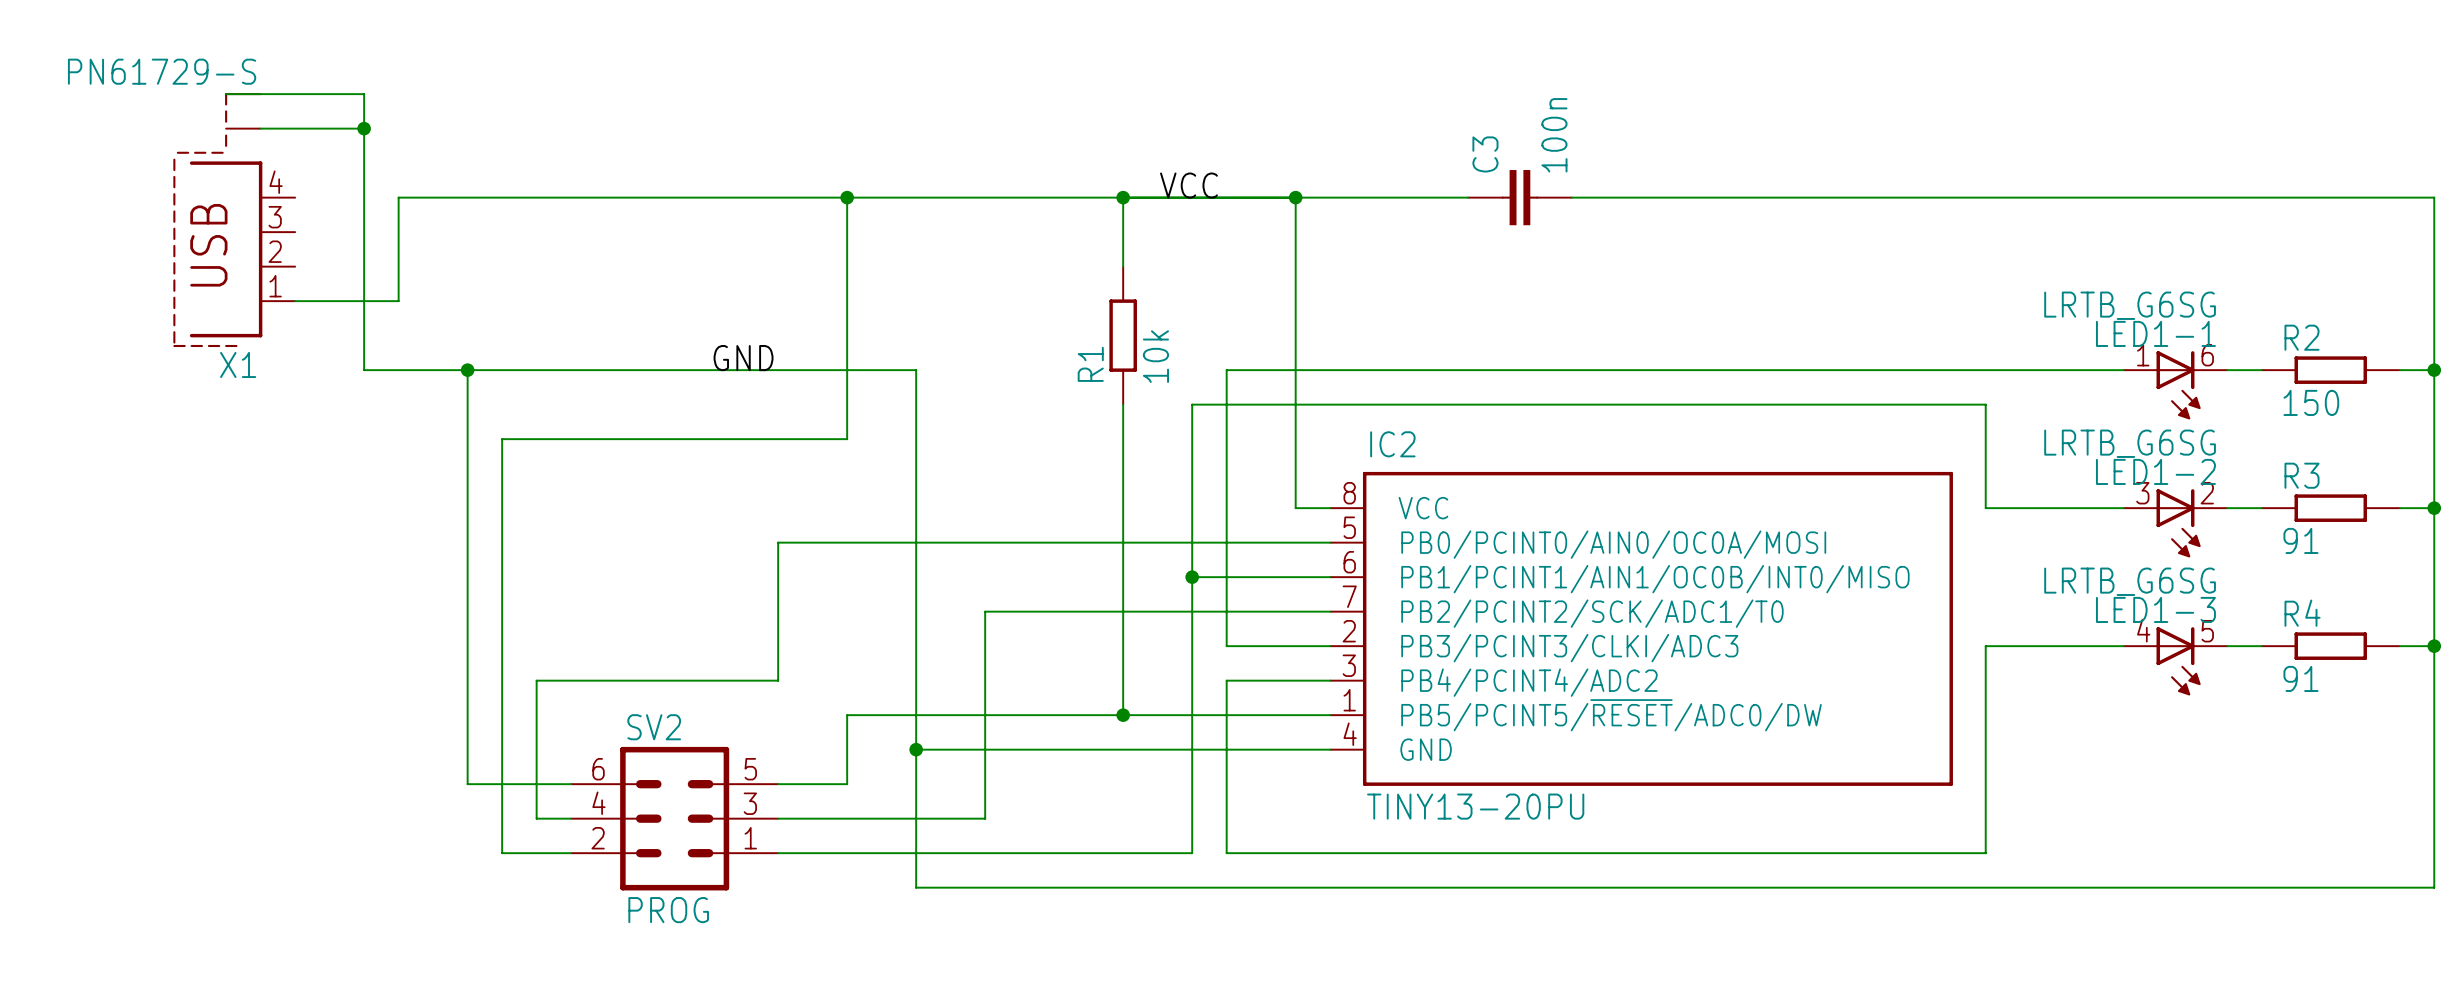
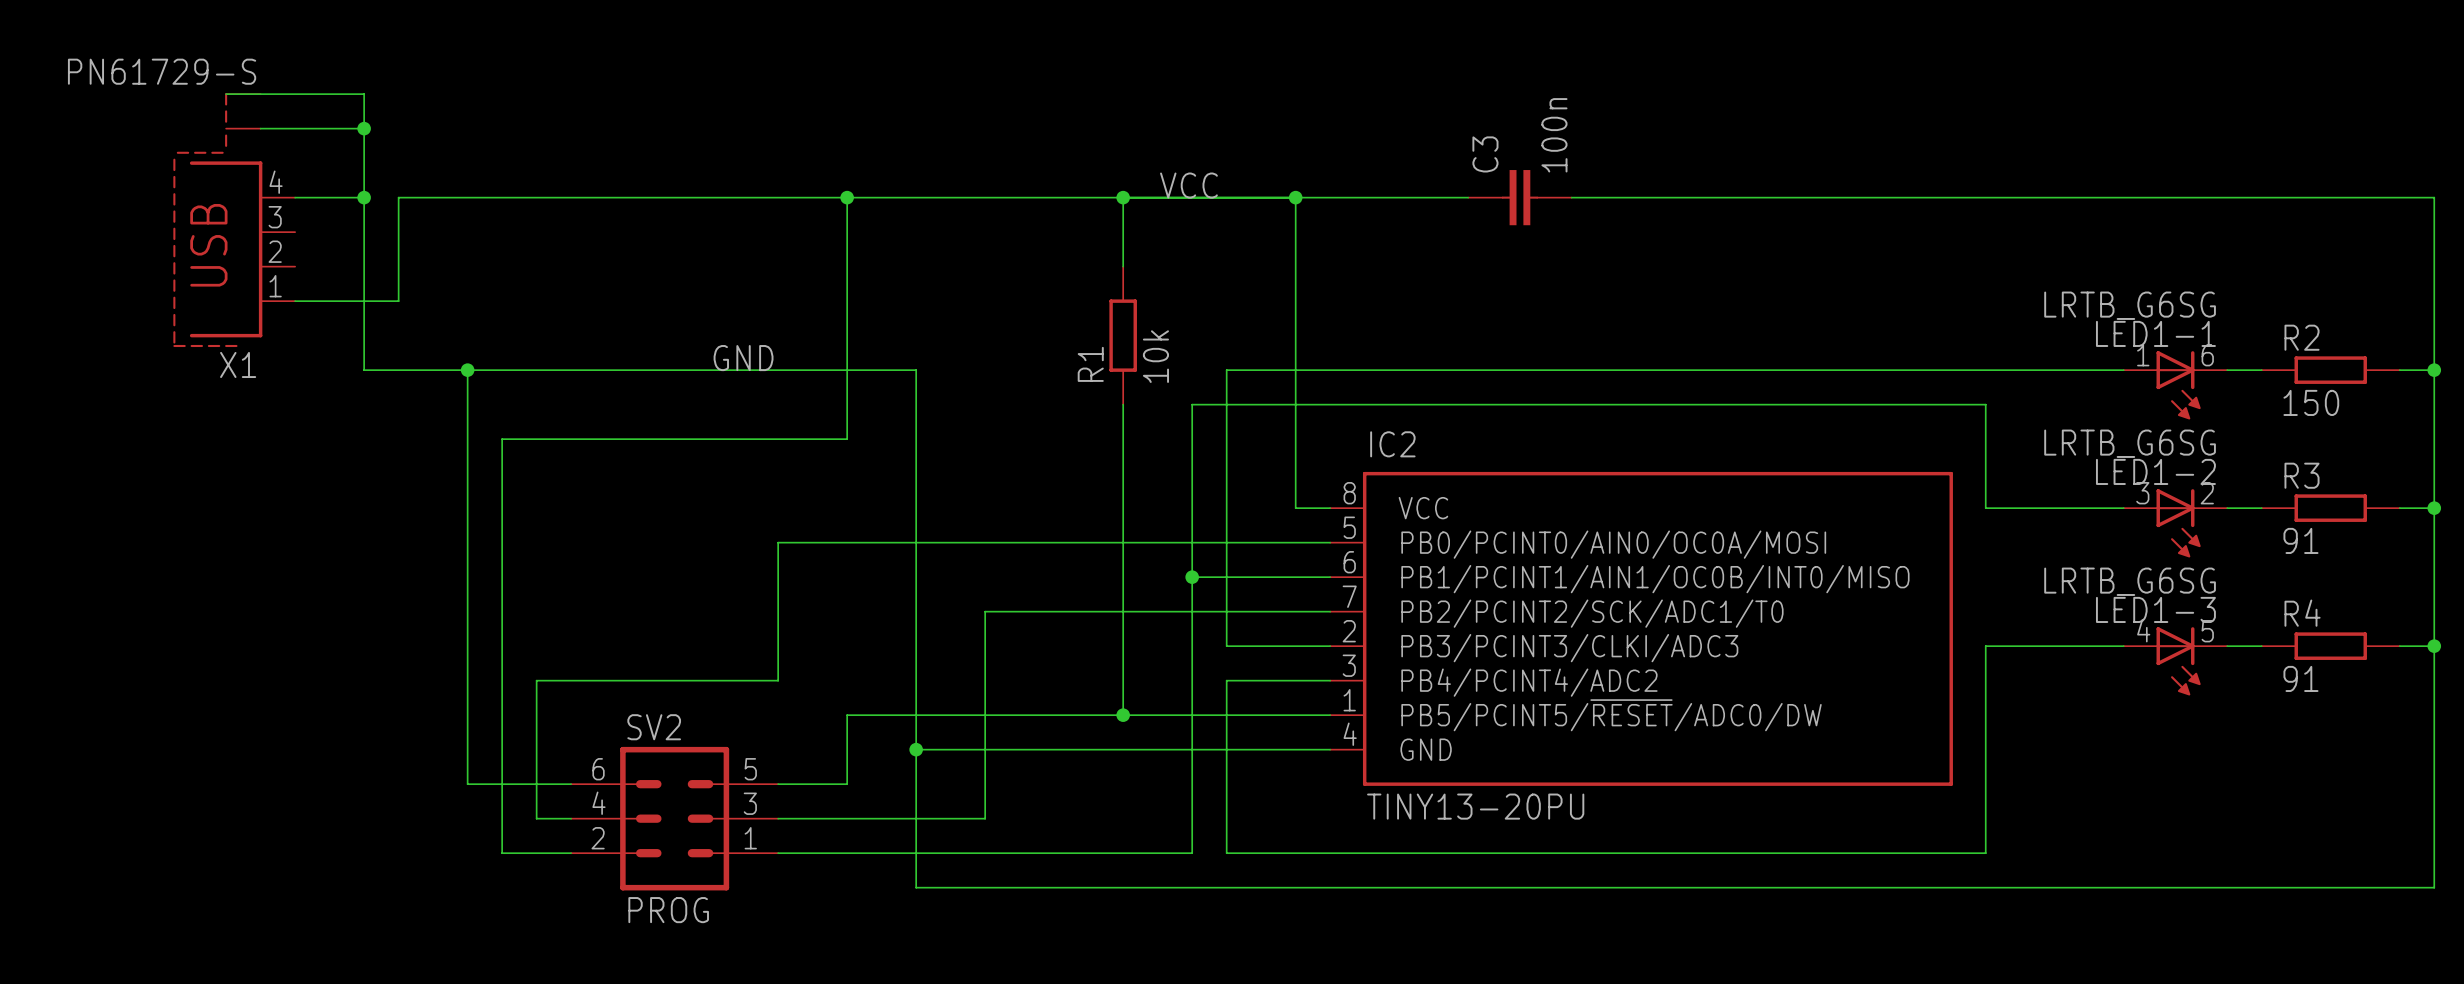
wire: none -> (295, 197) (364, 197)
junction: none -> (364, 197)

